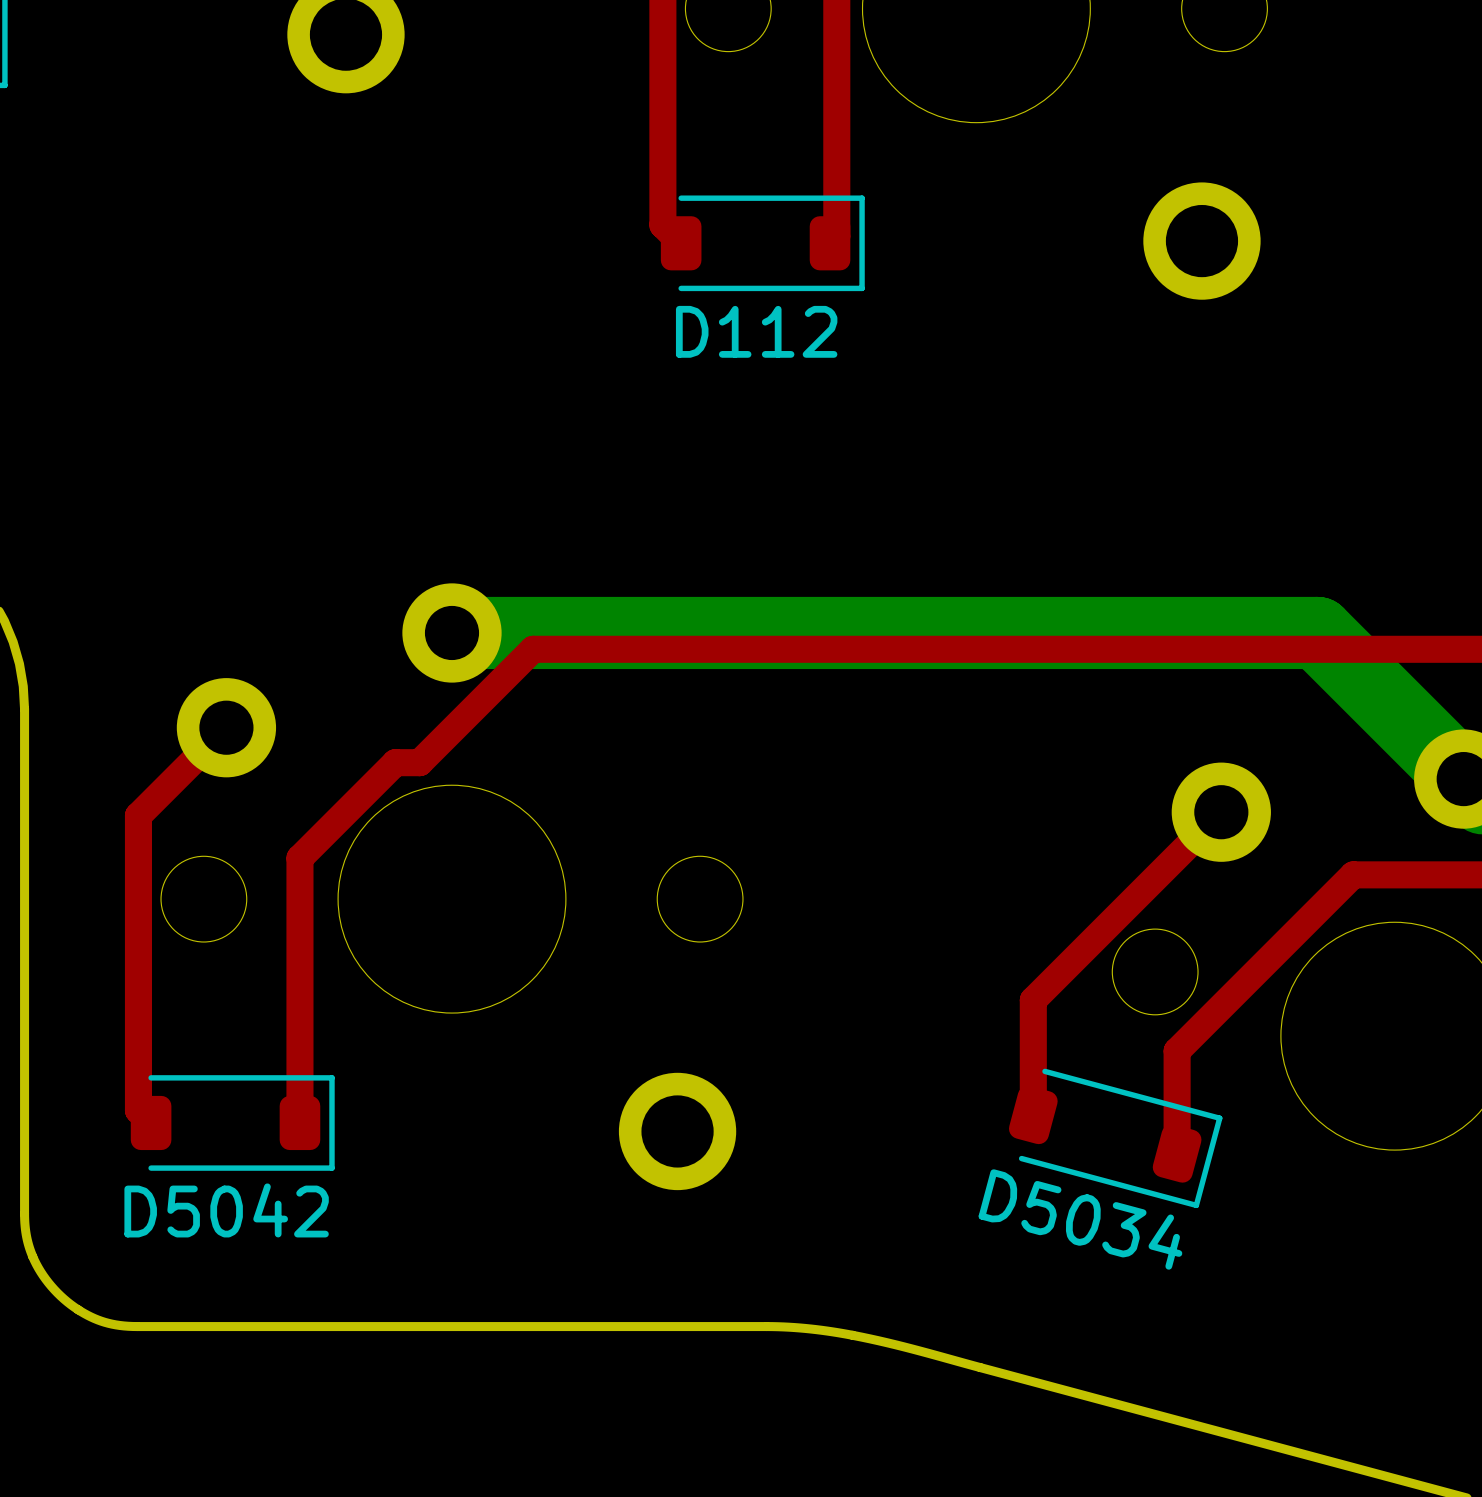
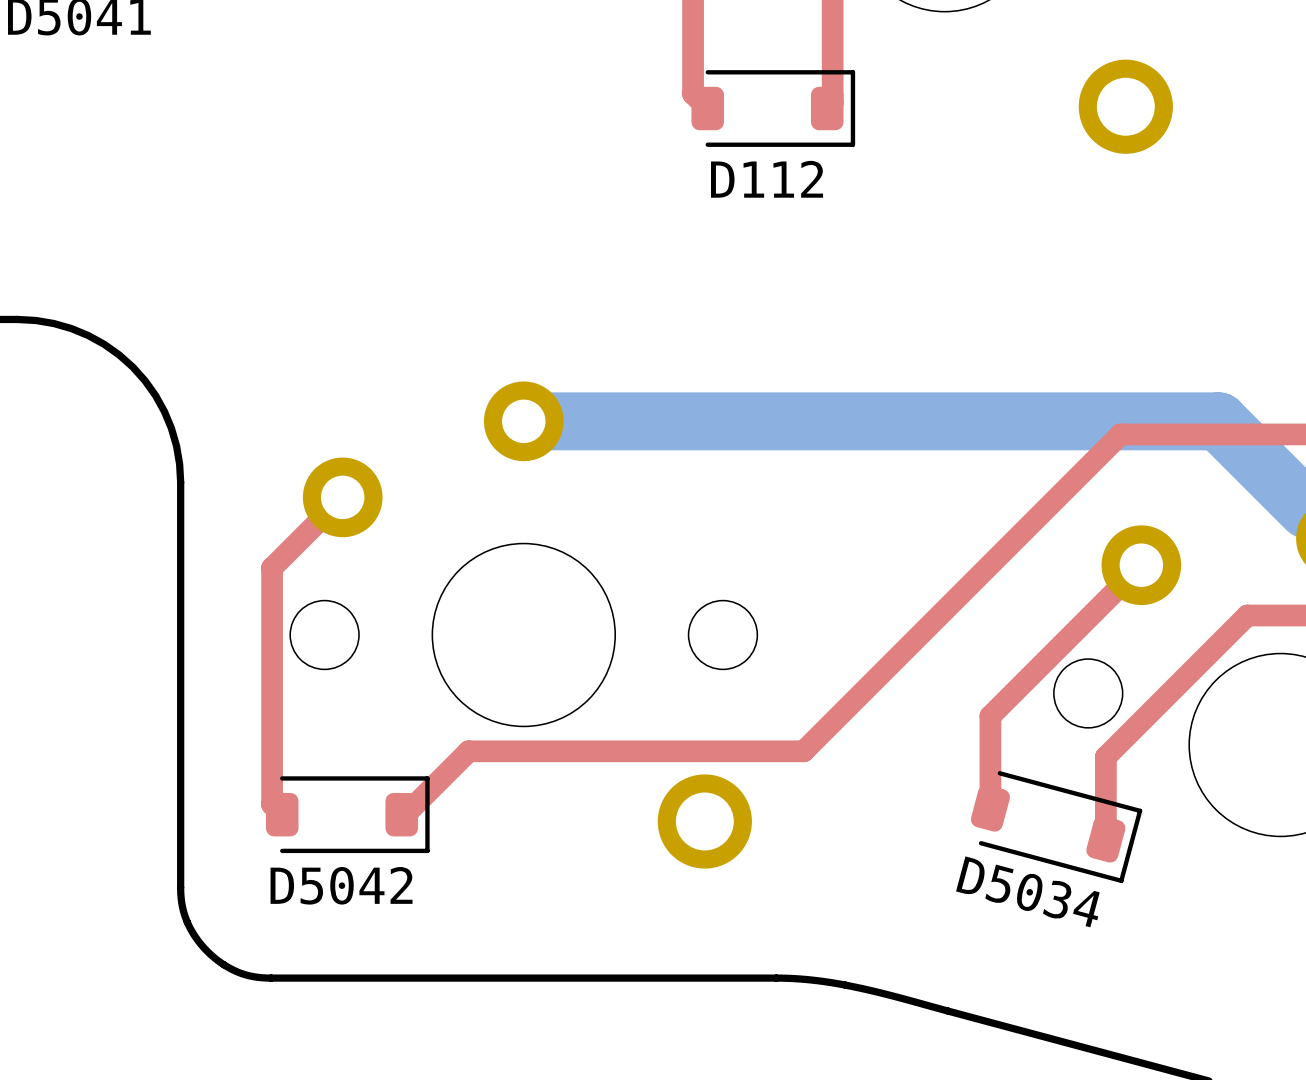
top track: (1195, 649) (533, 649) (419, 762) (395, 762) (299, 858) (299, 1122) -> (1120, 434) (803, 751) (468, 751) (405, 814) (401, 814)

